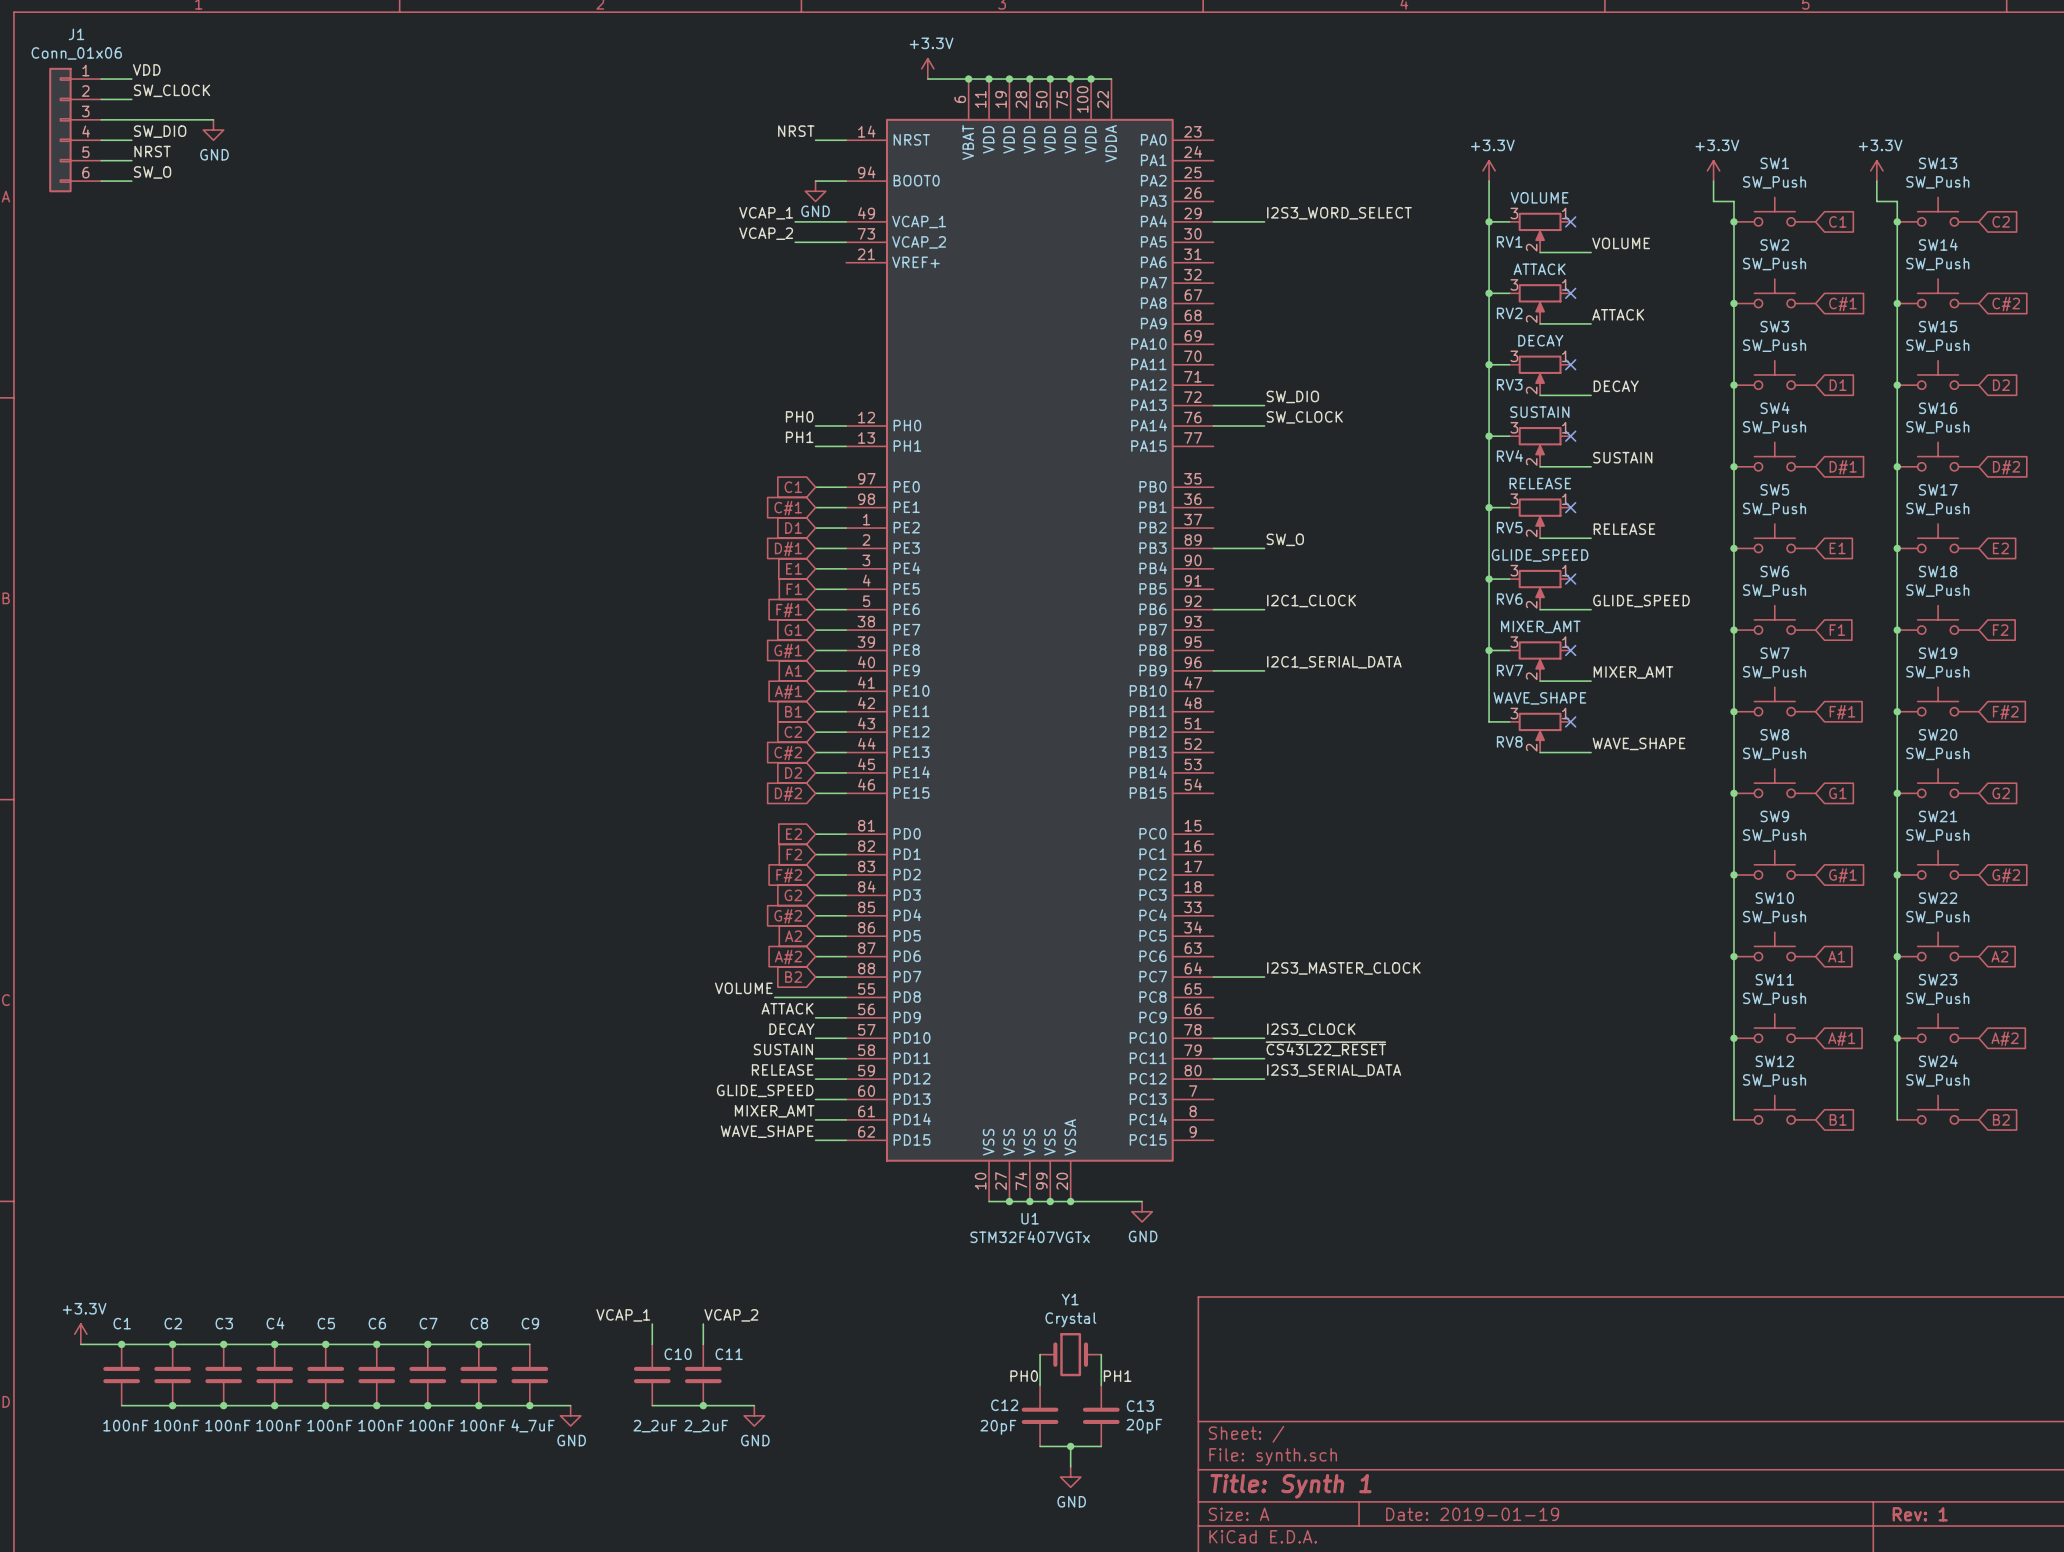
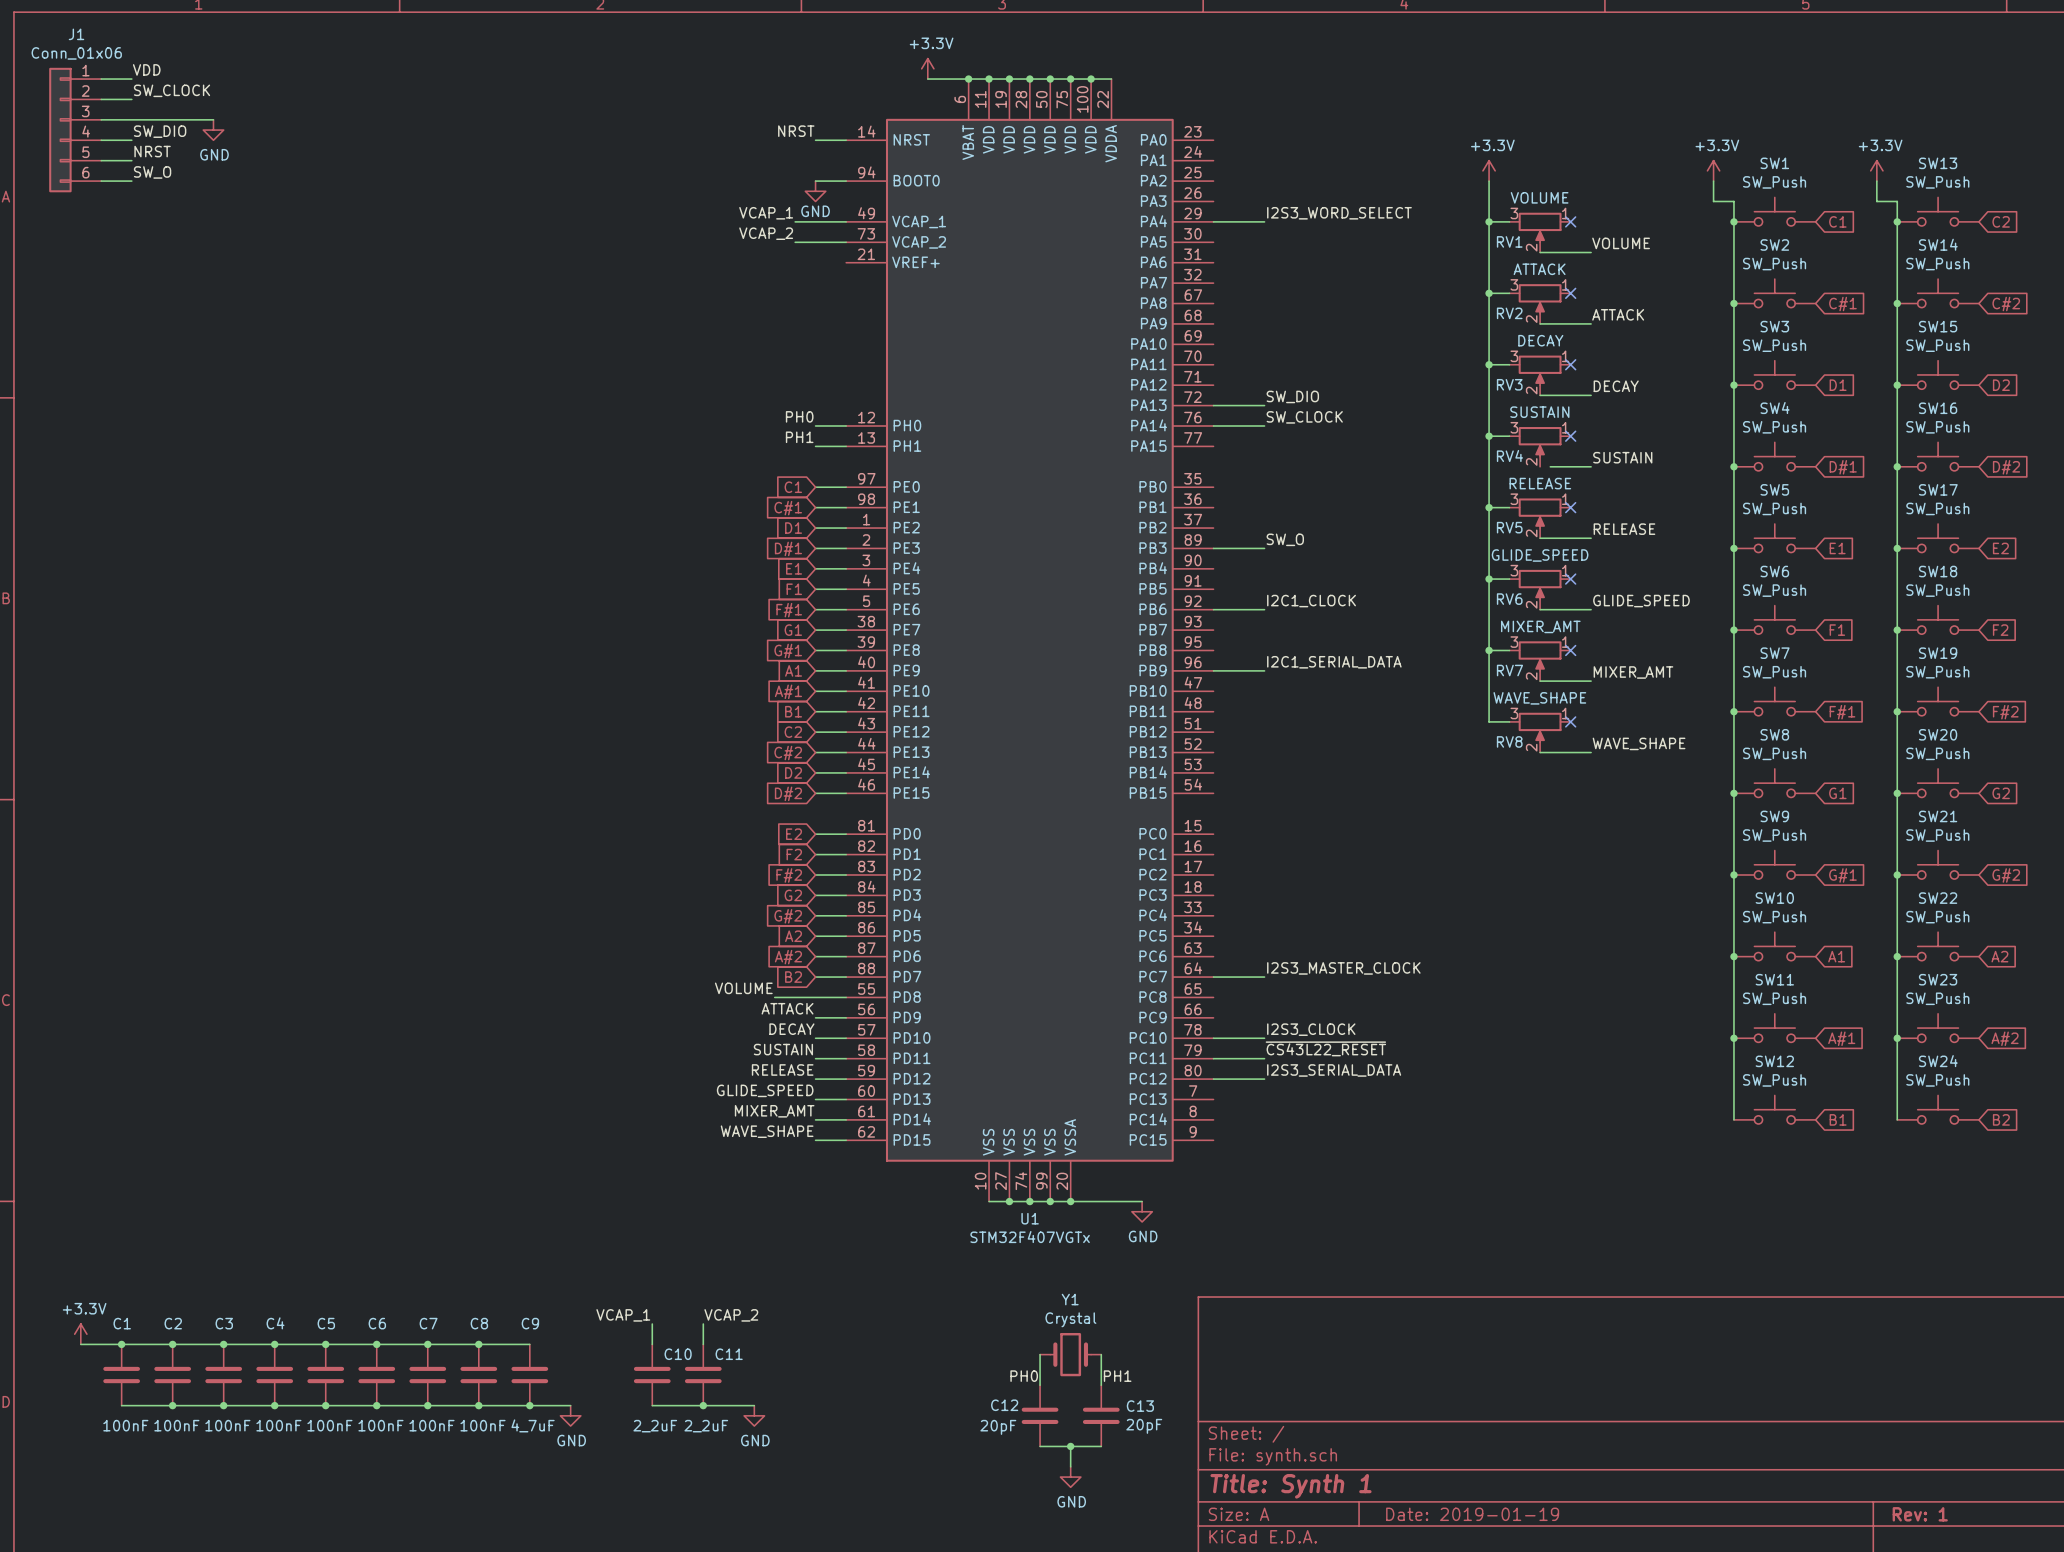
wire: (1540, 466) (1550, 466) -> none

